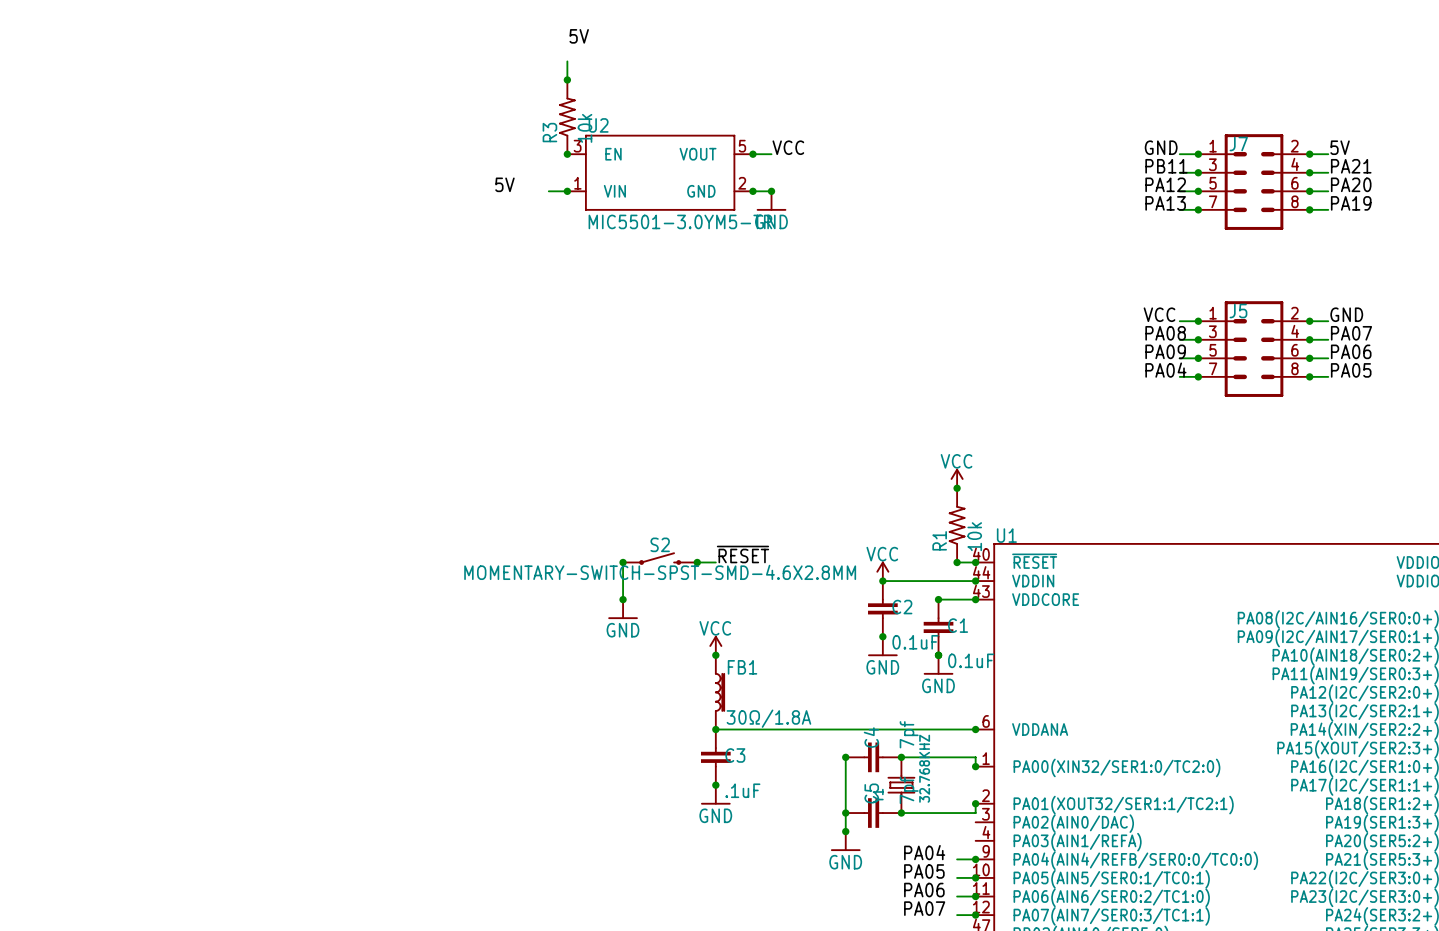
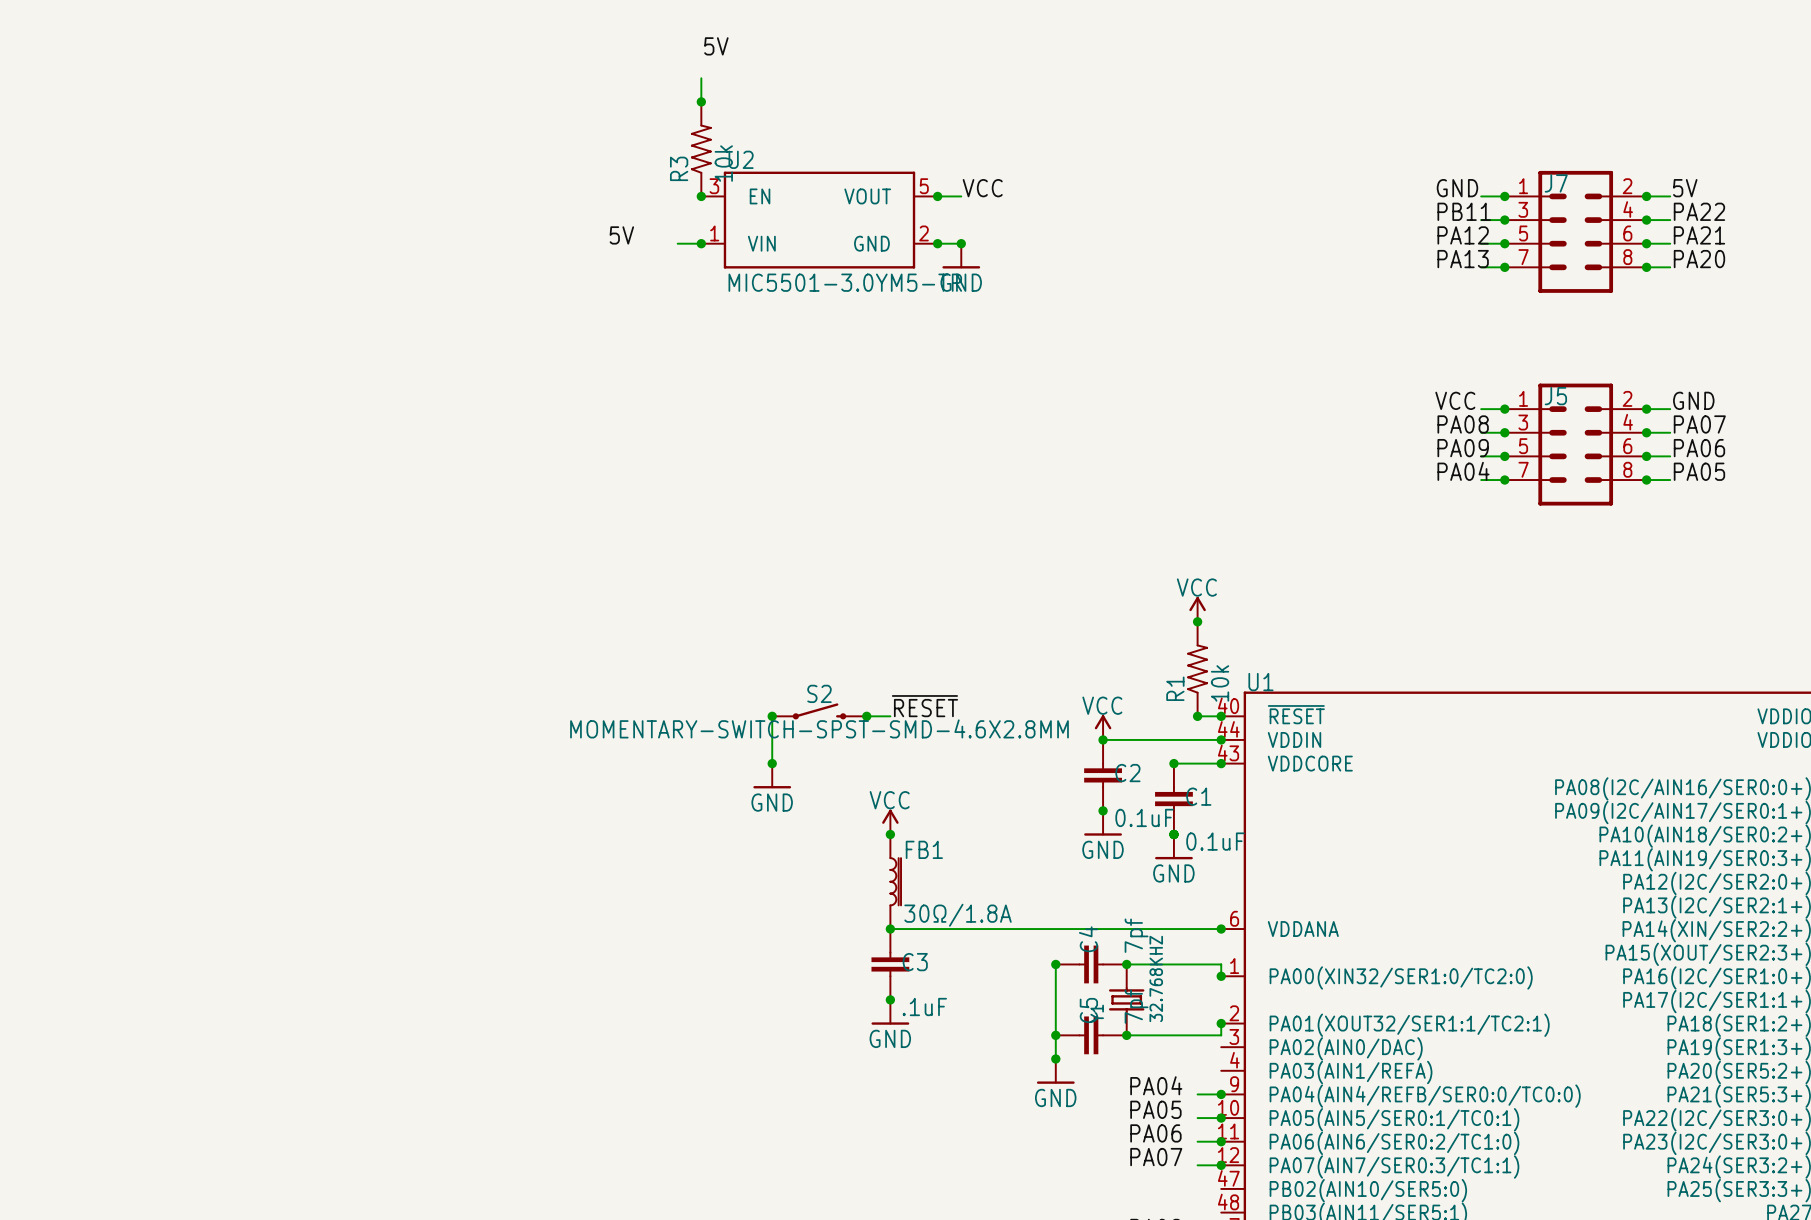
label: PA21 (1351, 166) -> PA22 (1699, 211)
label: PA20 (1351, 184) -> PA21 (1699, 235)
label: PA19 (1351, 203) -> PA20 (1699, 259)

